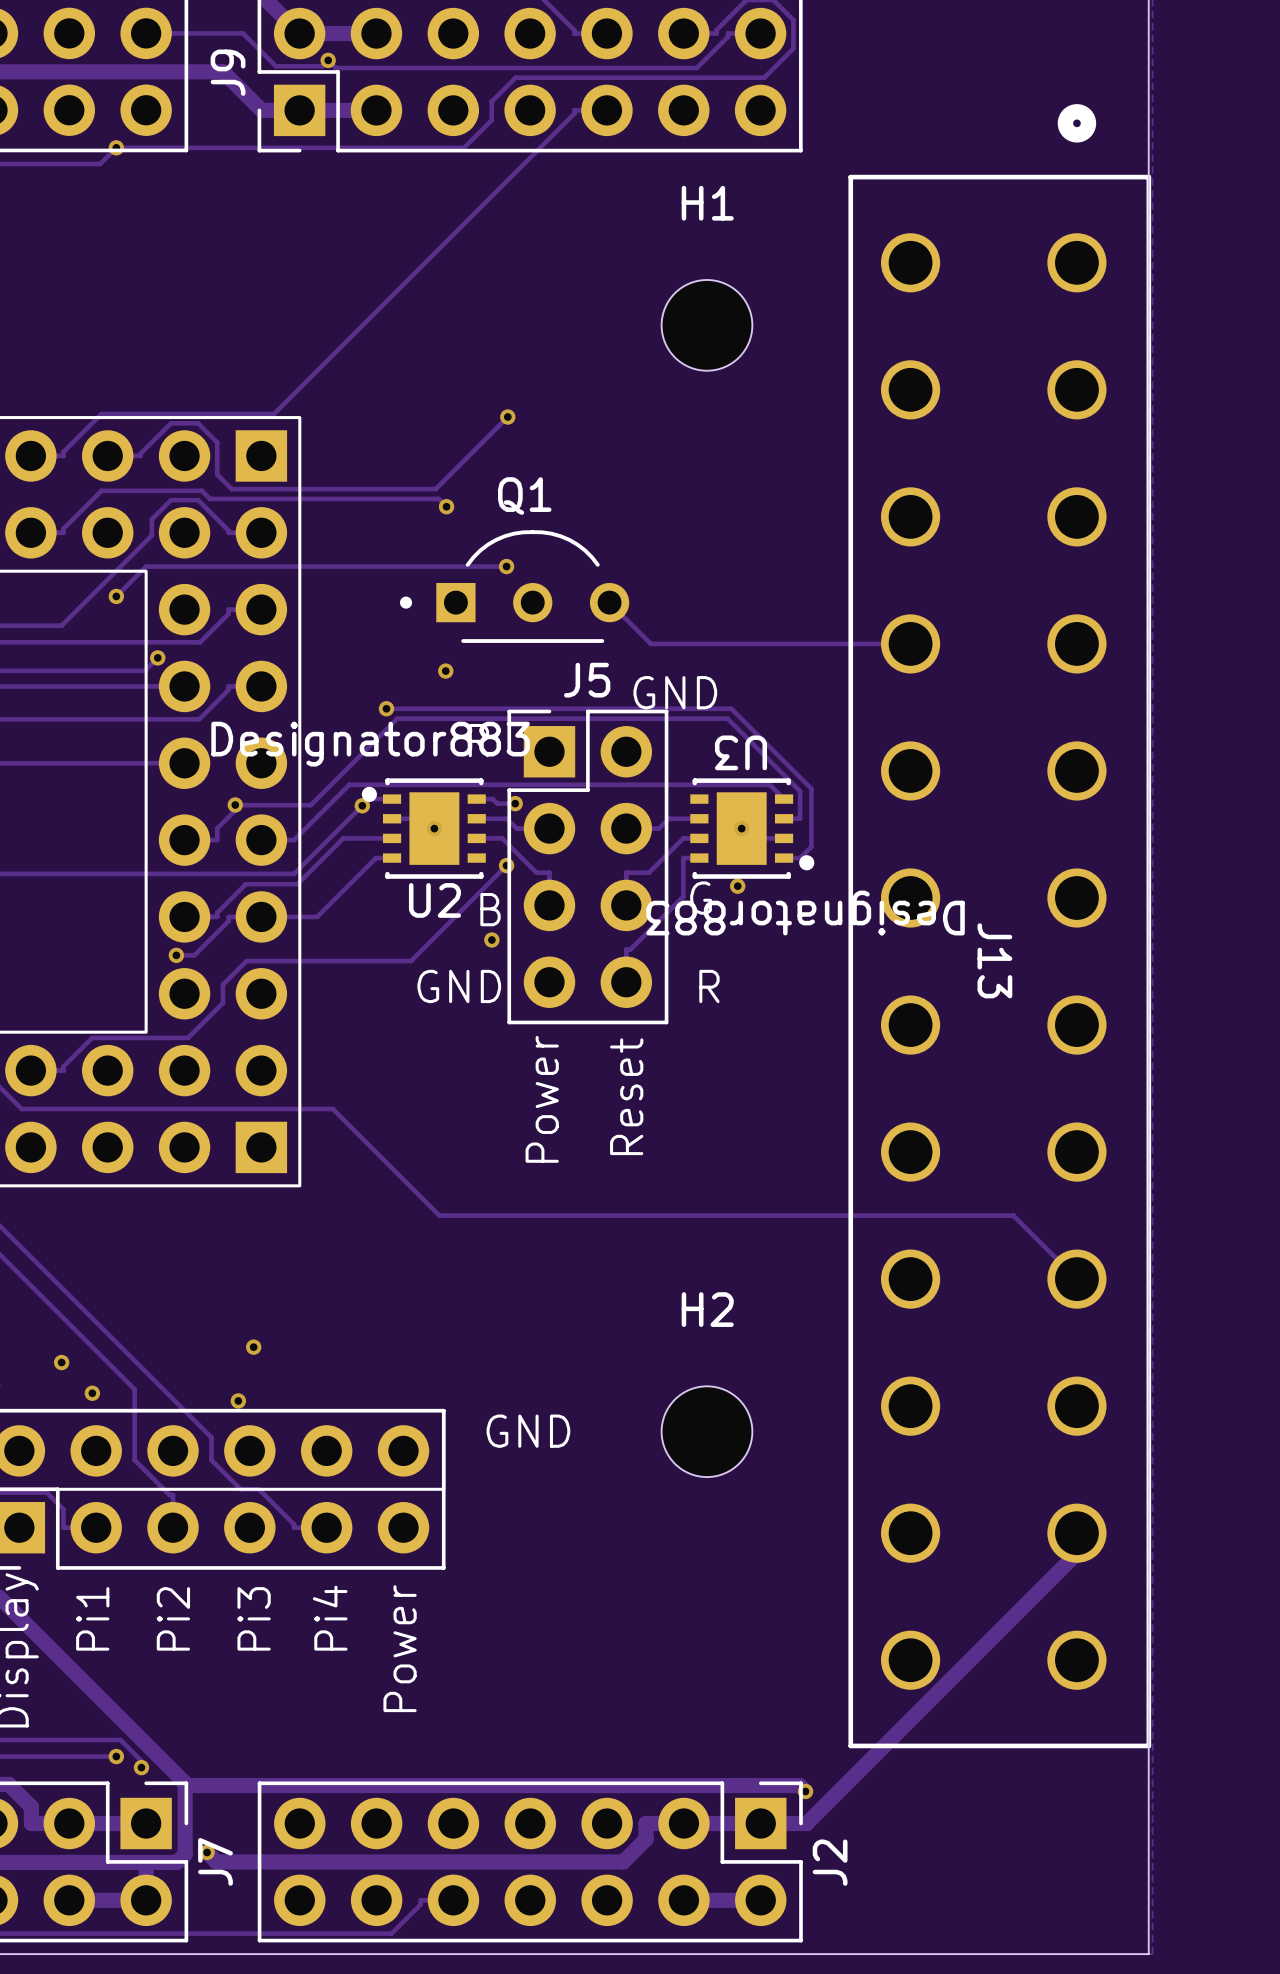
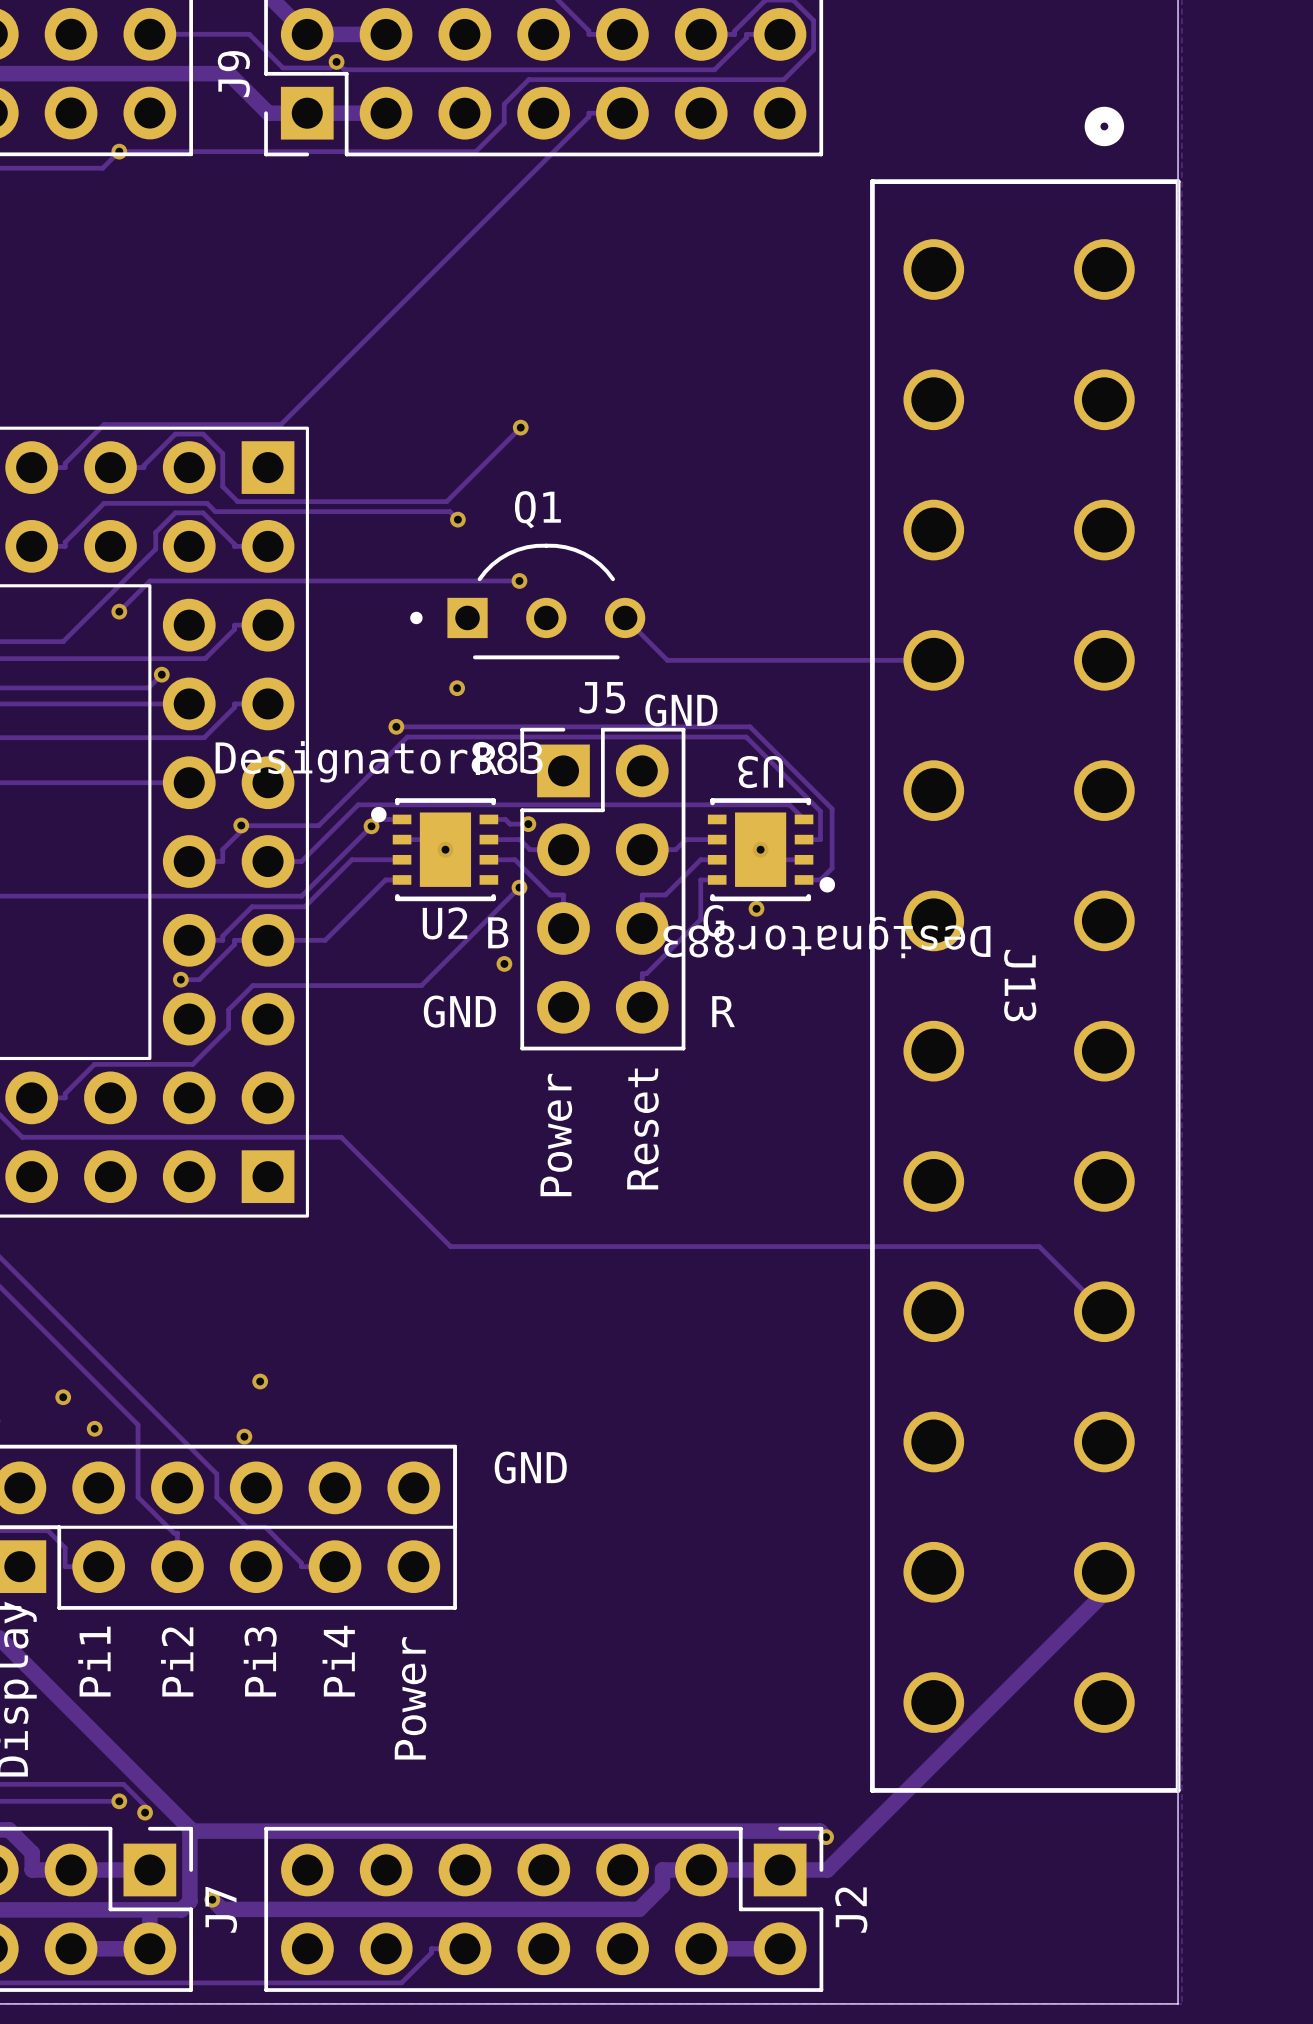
H1: (706, 325) -> none
H2: (706, 1431) -> none

